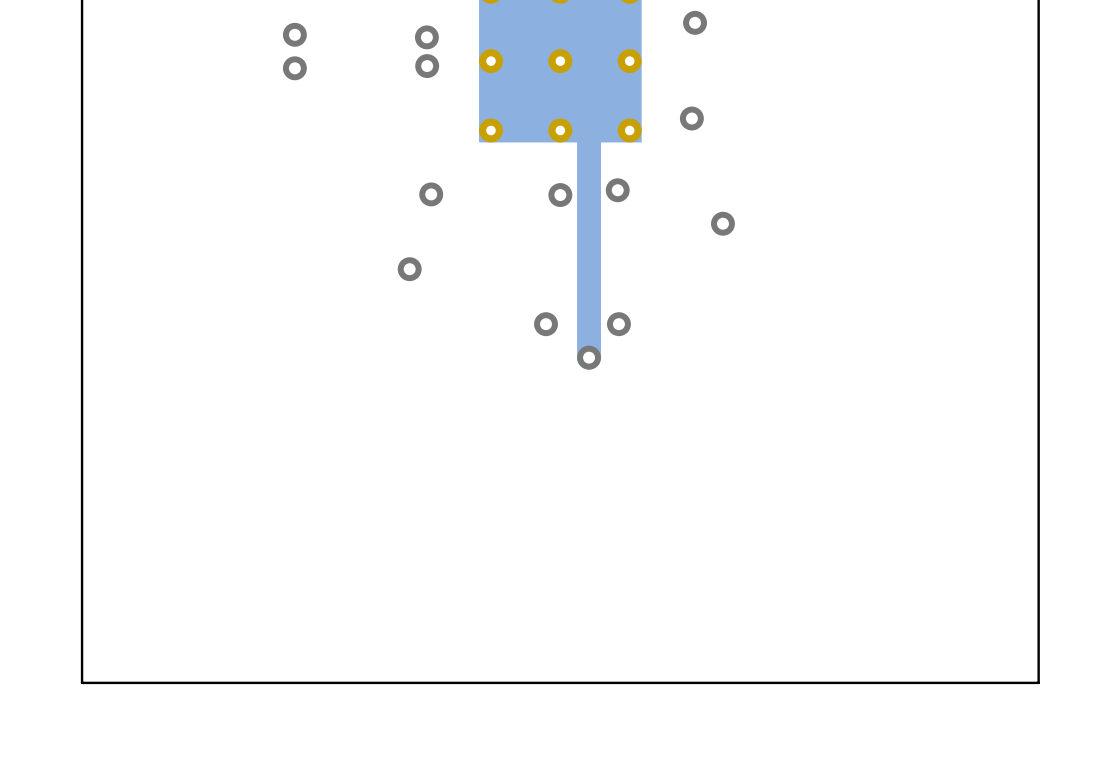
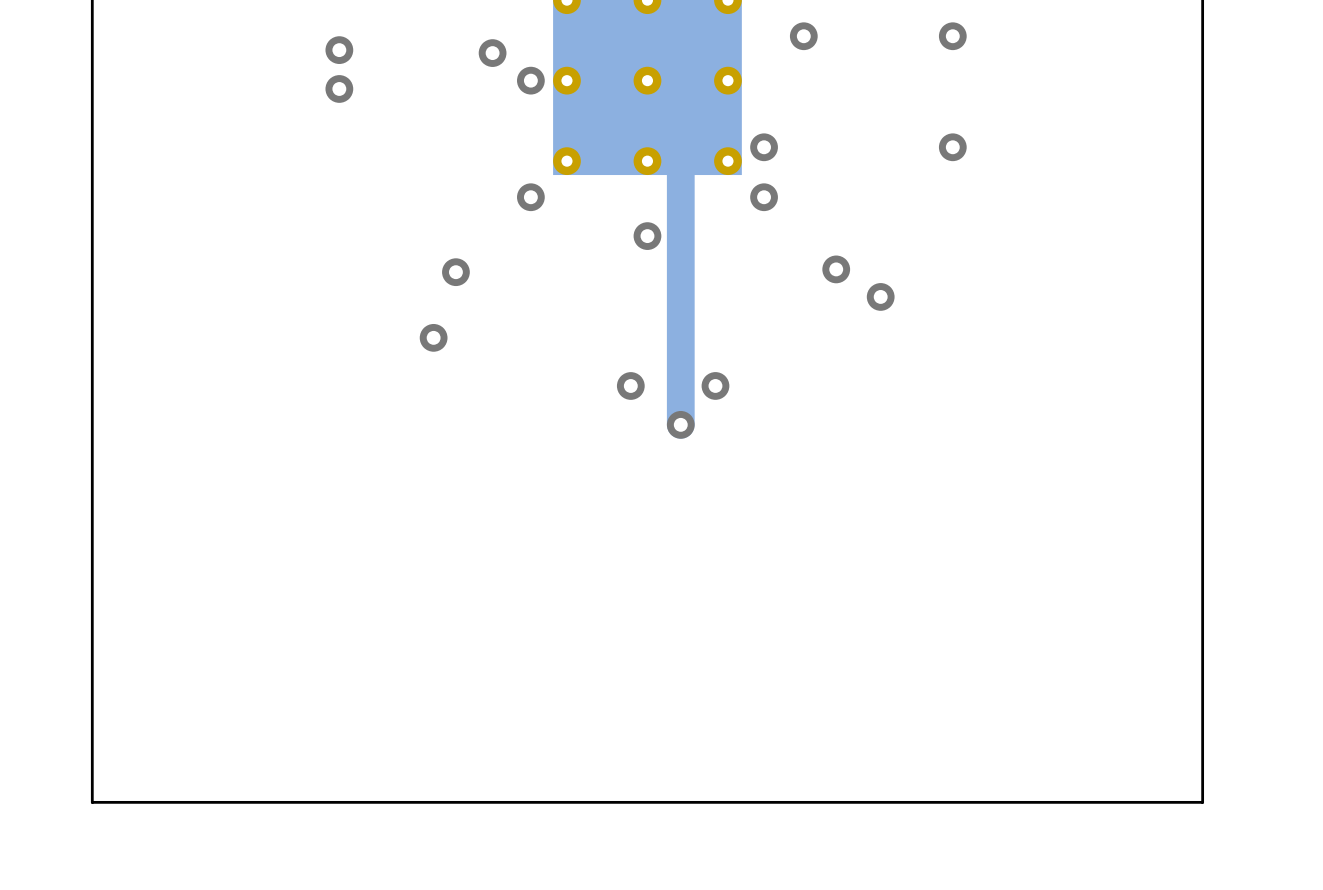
via: none -> (952, 36)
via position: (427, 66) -> (530, 80)
via: none -> (764, 147)
via: (691, 118) -> none
via: none -> (952, 147)
via: none -> (530, 197)
via: none -> (764, 197)
via: (617, 190) -> none
via: (431, 194) -> none
via: none -> (455, 272)
via: none -> (880, 296)
via: (409, 269) -> none
via: none -> (433, 337)

